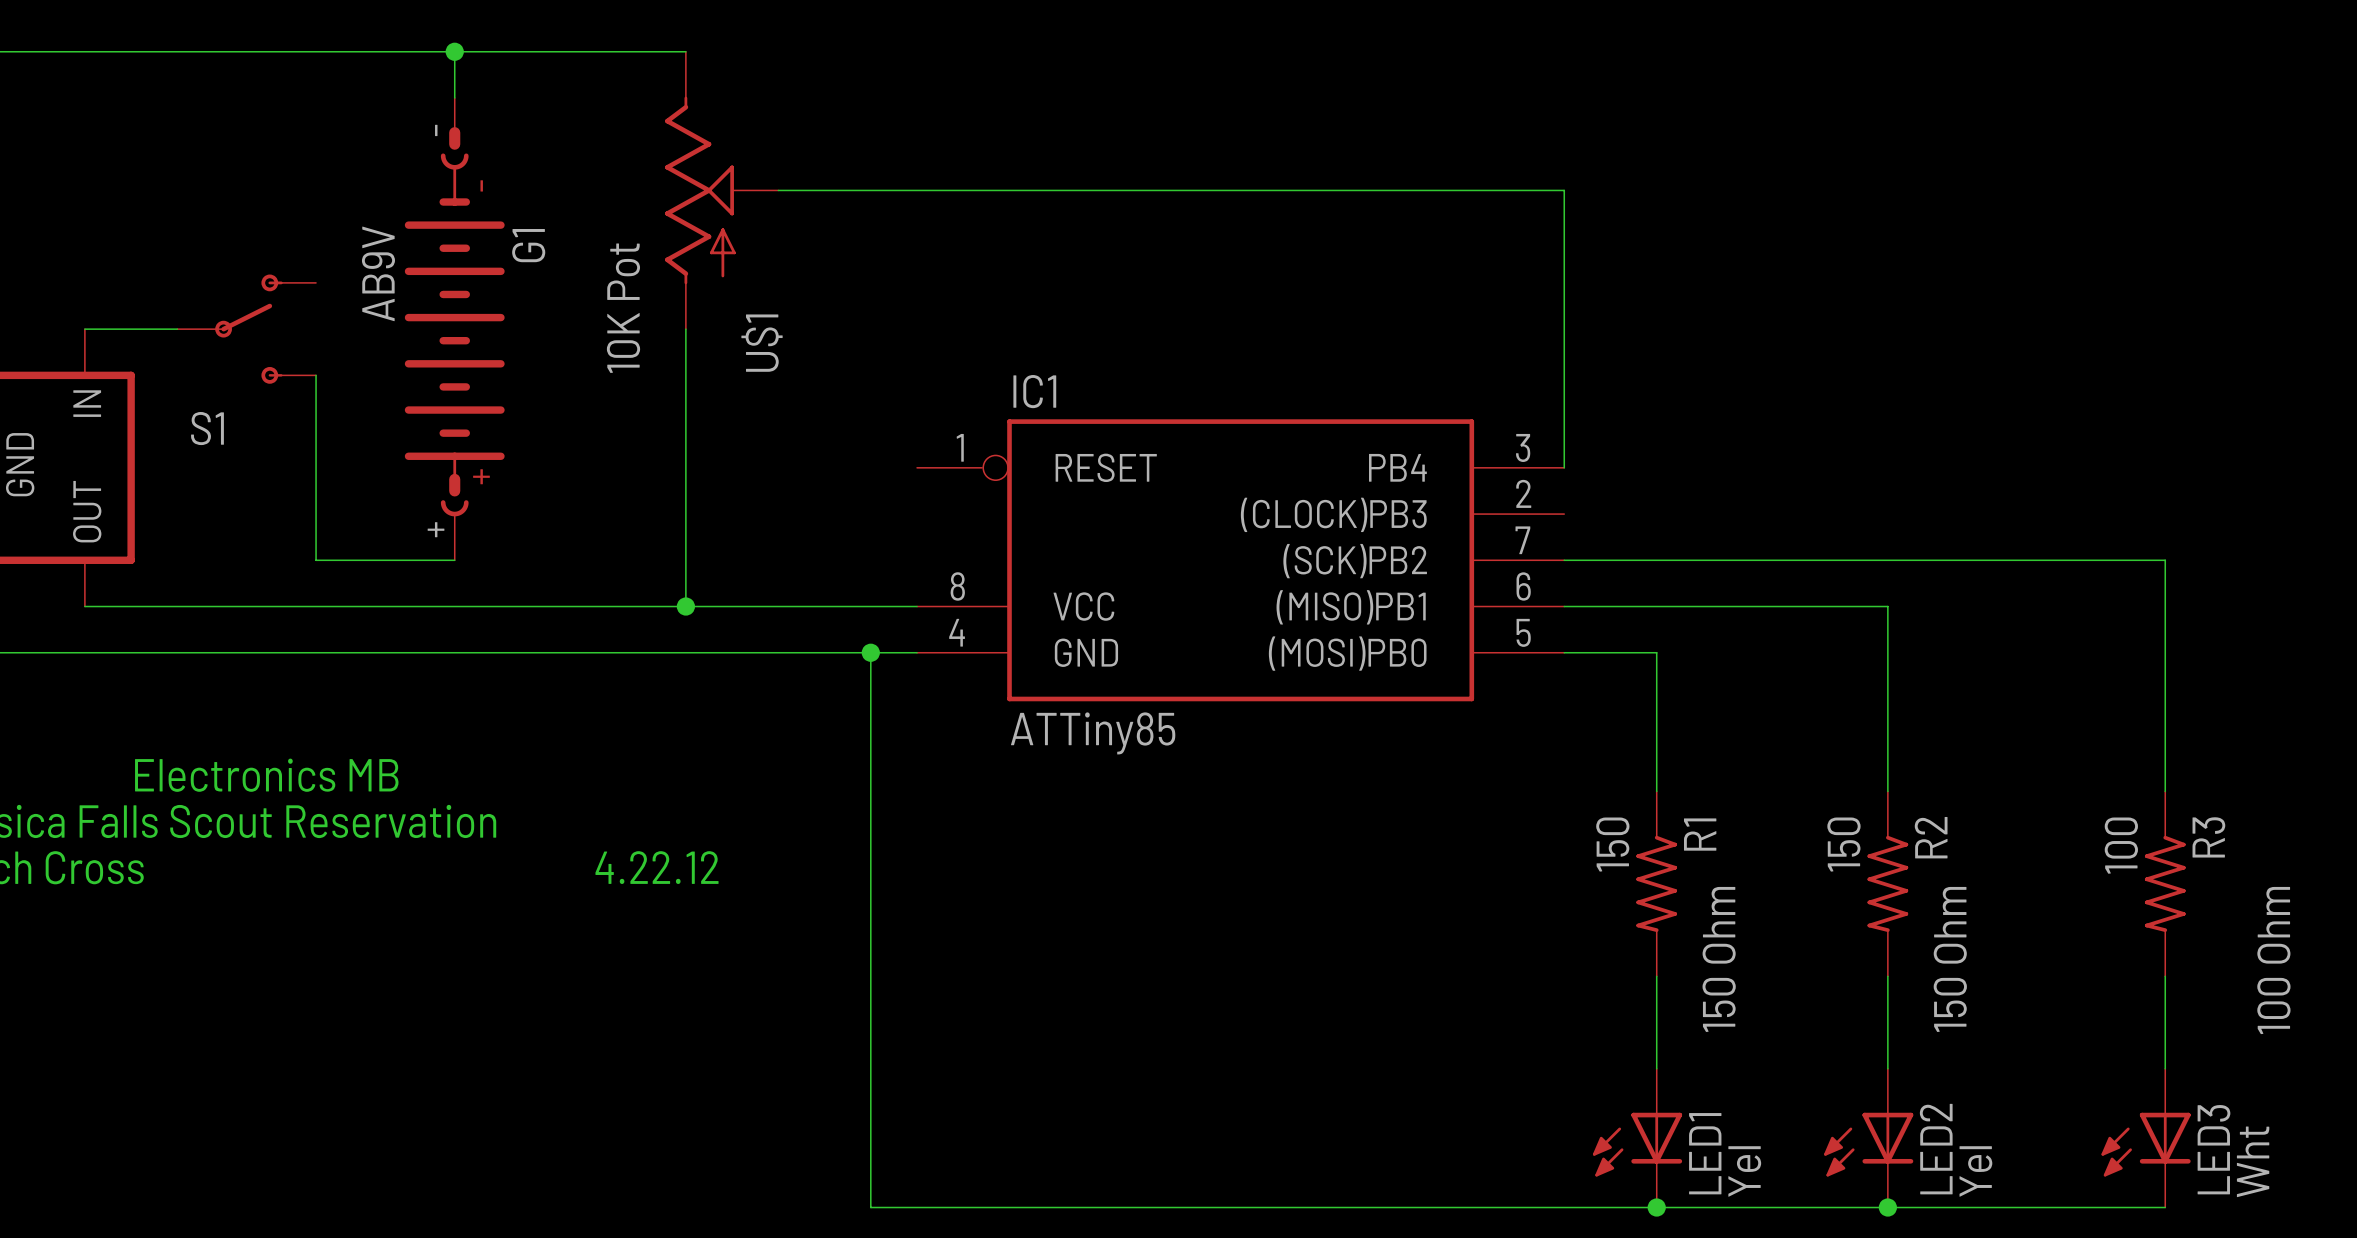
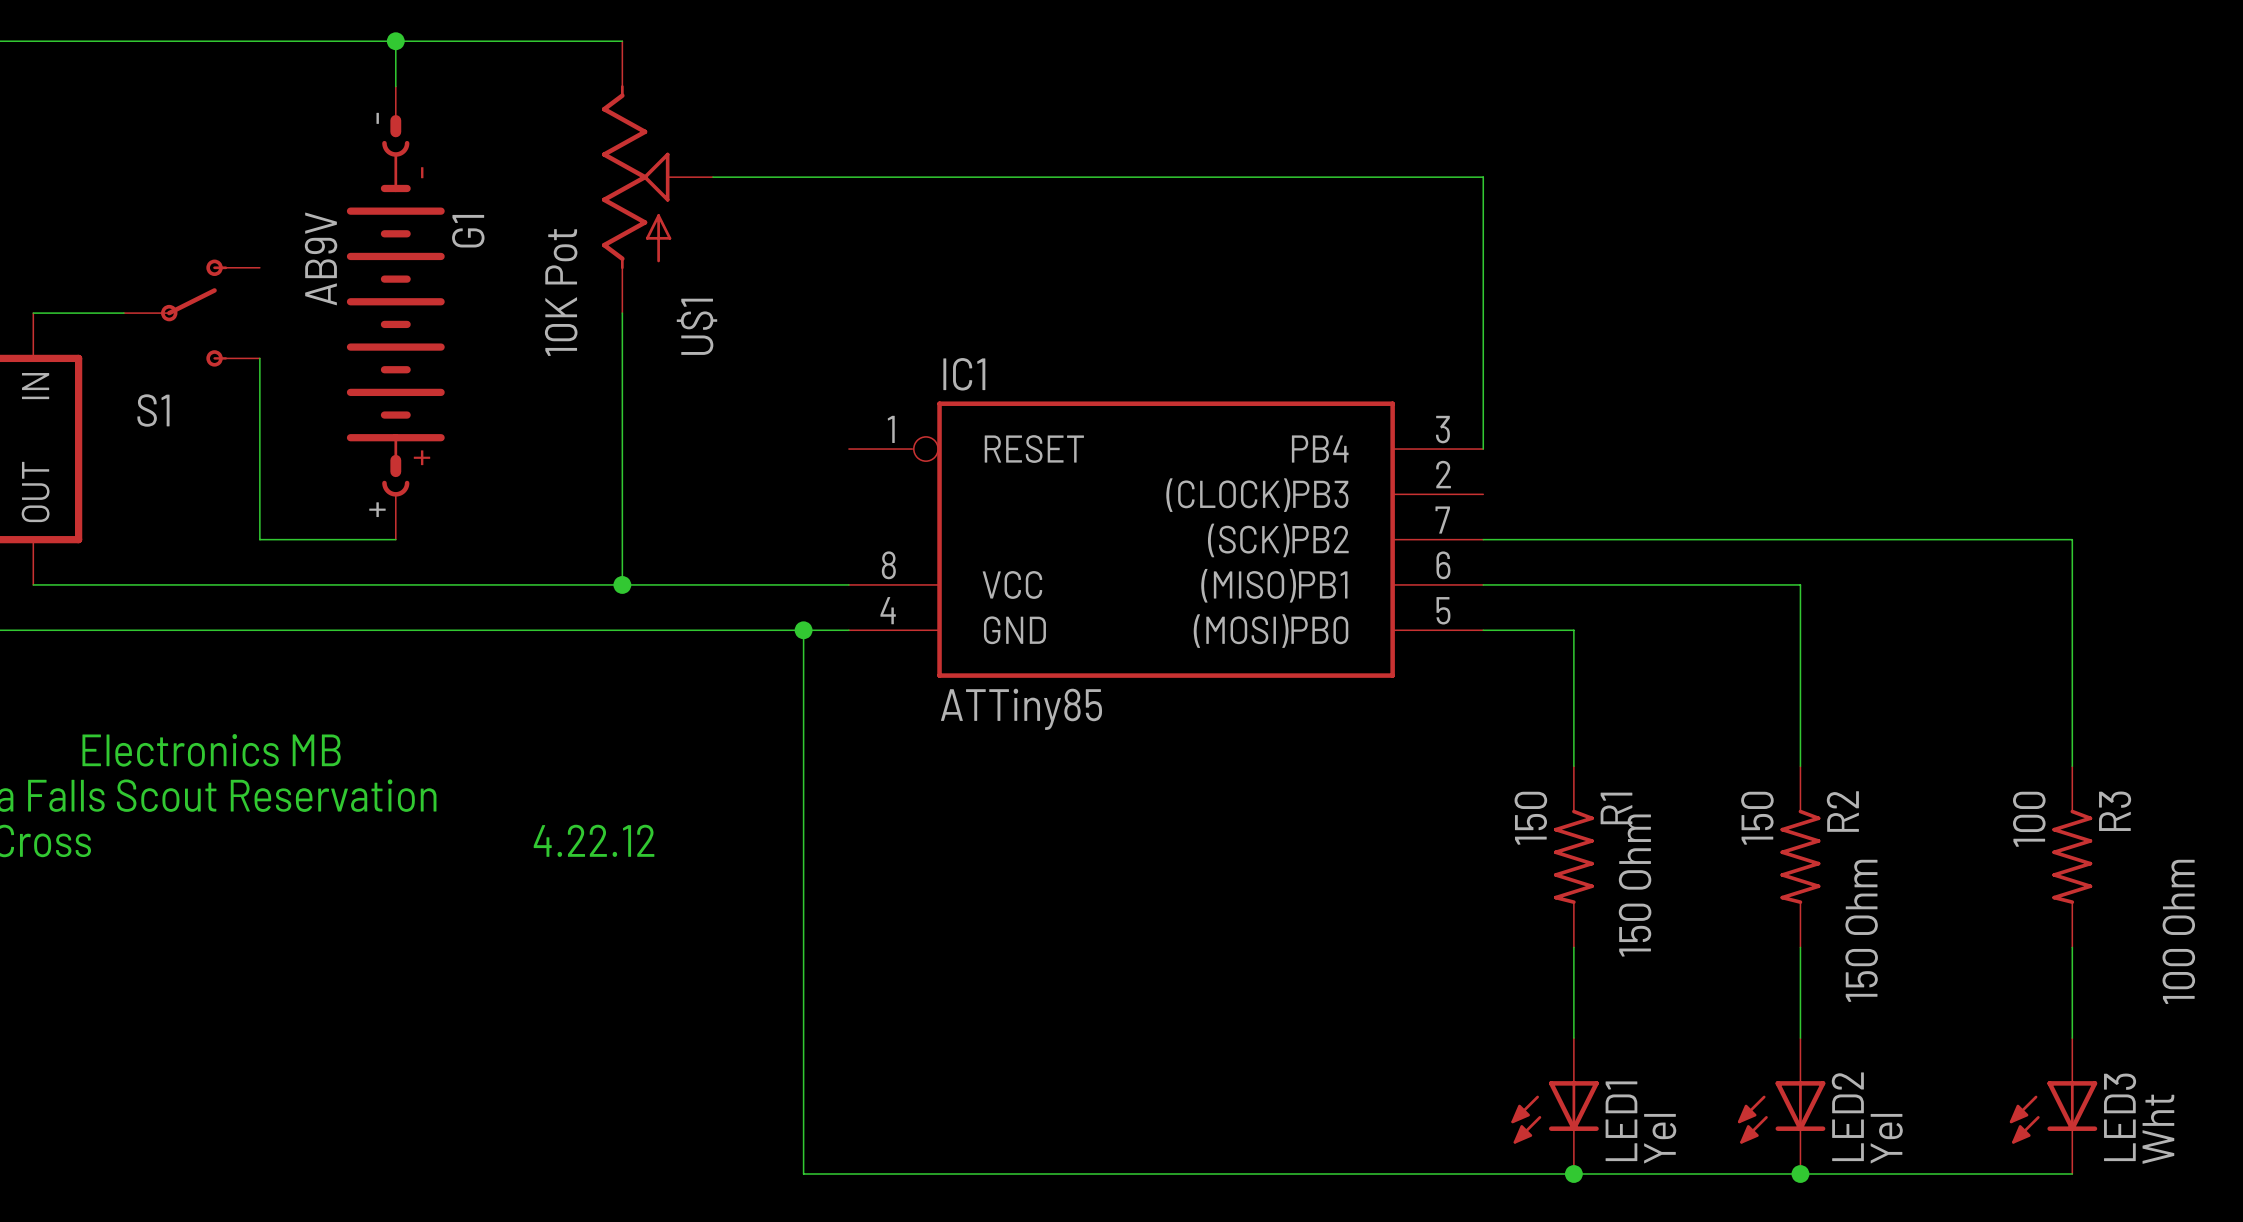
R1 text position: 150 Ohm (1719, 959) -> 150 Ohm (1635, 885)

